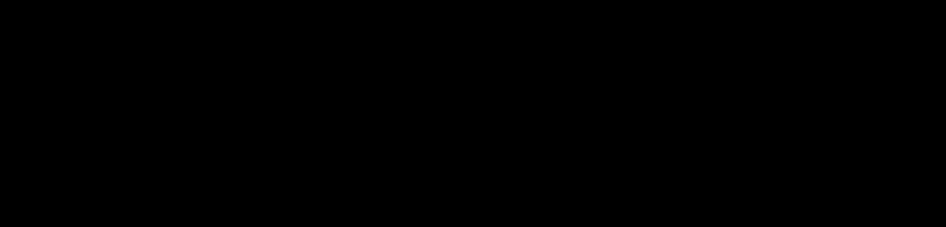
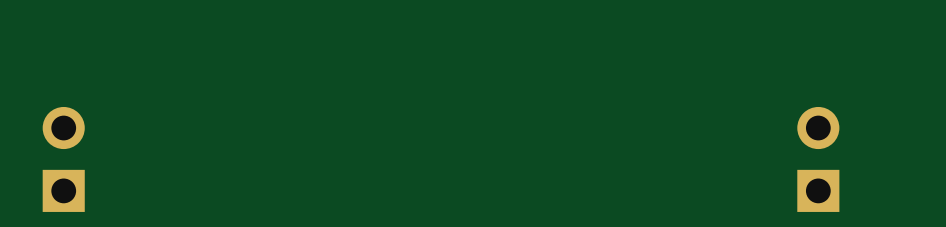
part: none -> (63, 159)
part: none -> (818, 159)

